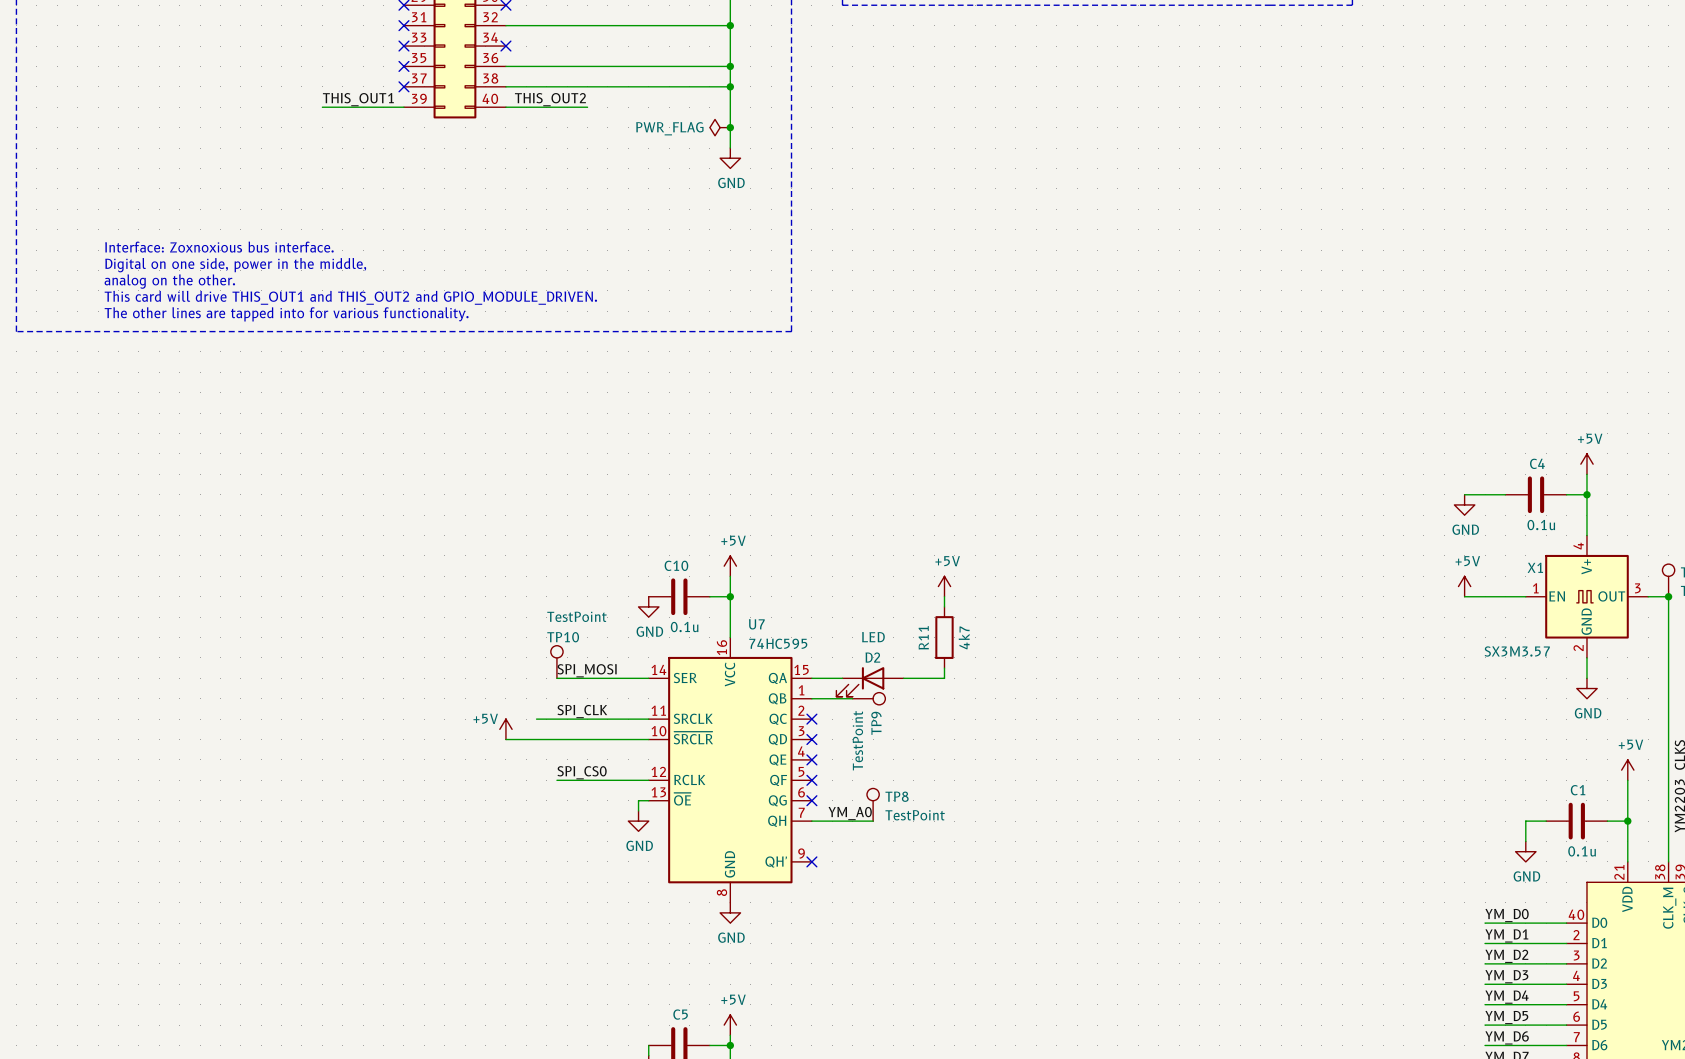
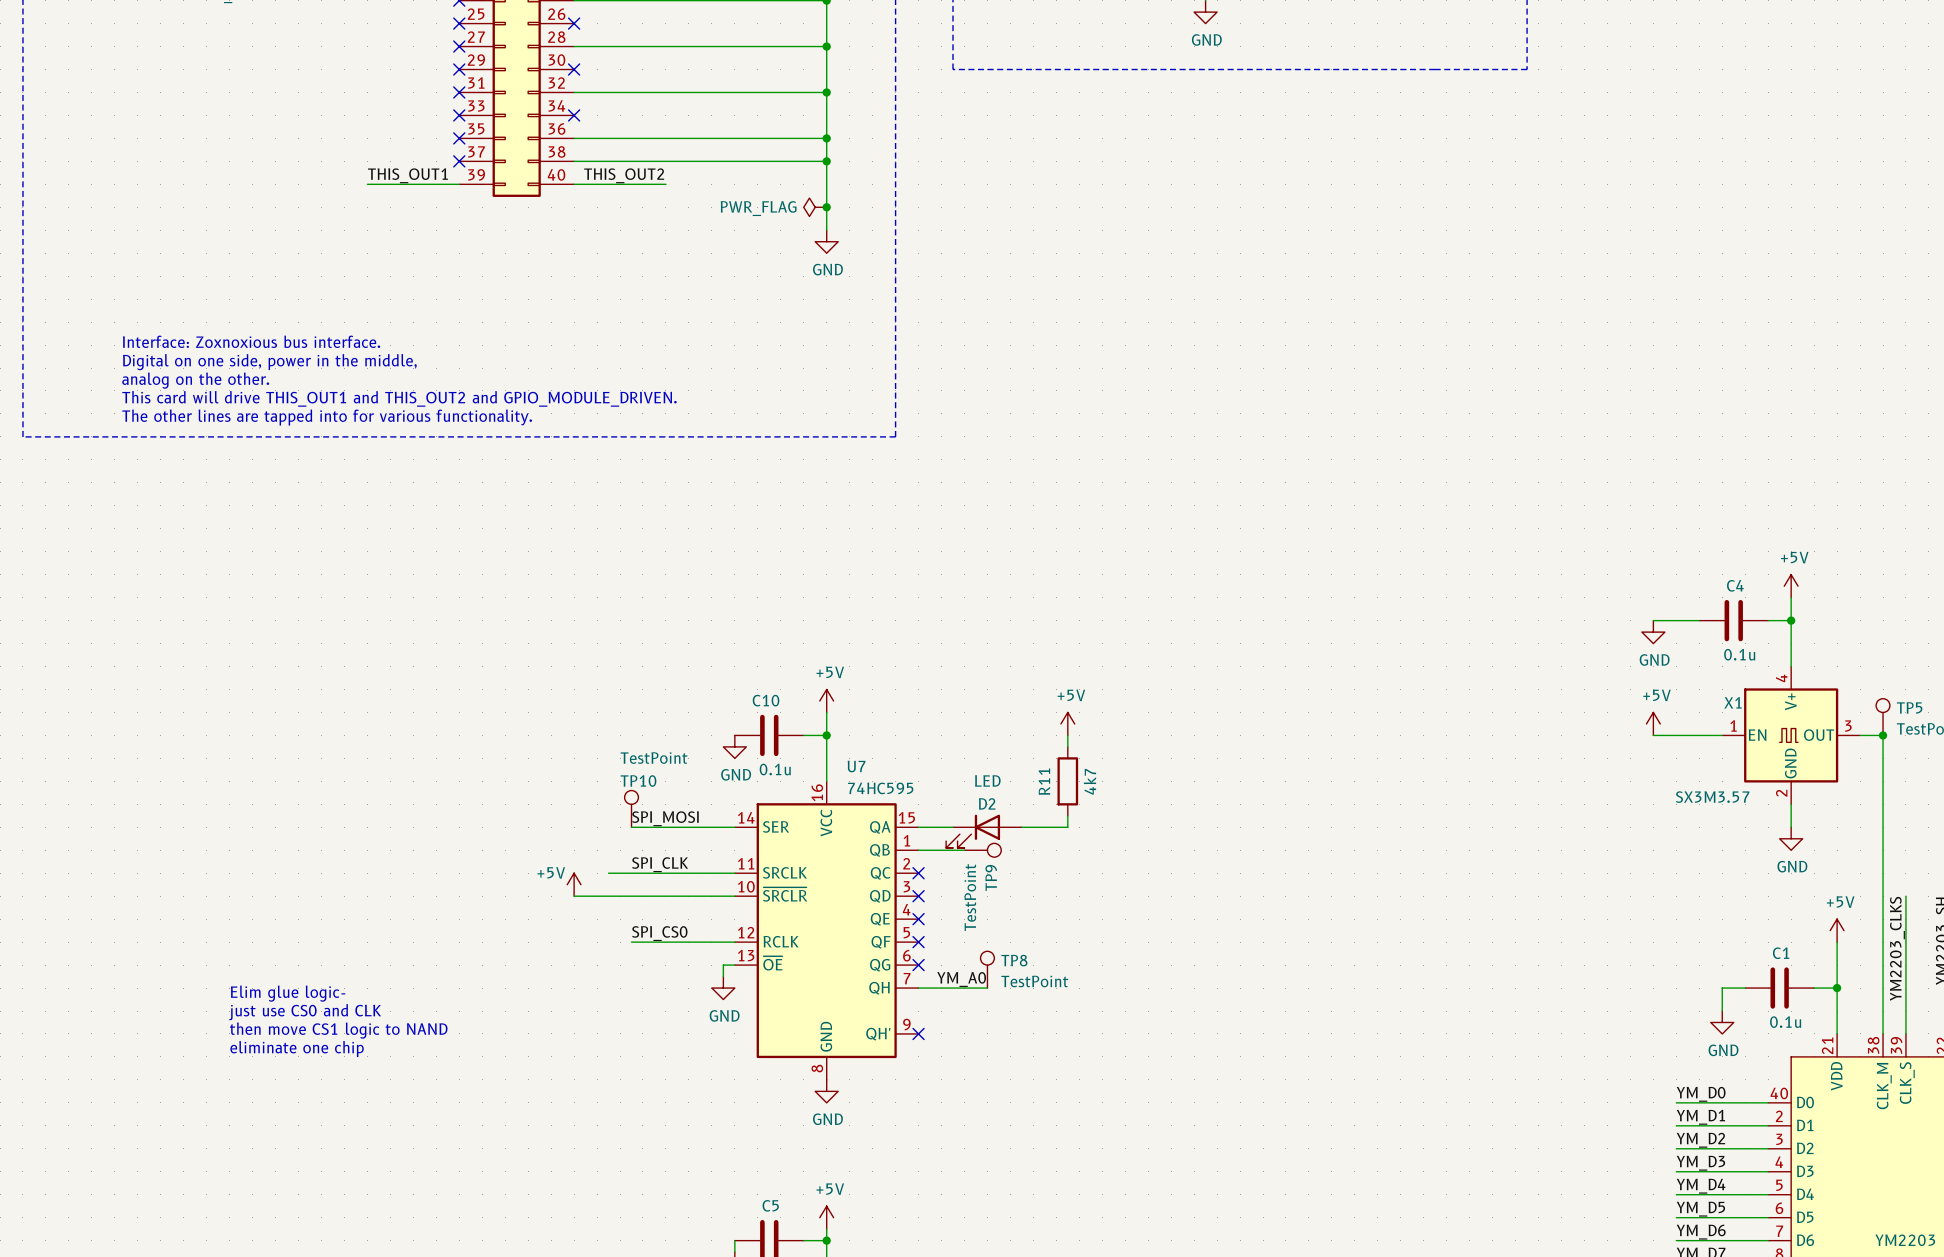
text: none -> Elim glue logic- (288, 993)
text: none -> just use CS0 and CLK (305, 1012)
text: none -> then move CS1 logic to NAND (338, 1030)
text: none -> eliminate one chip (297, 1049)

